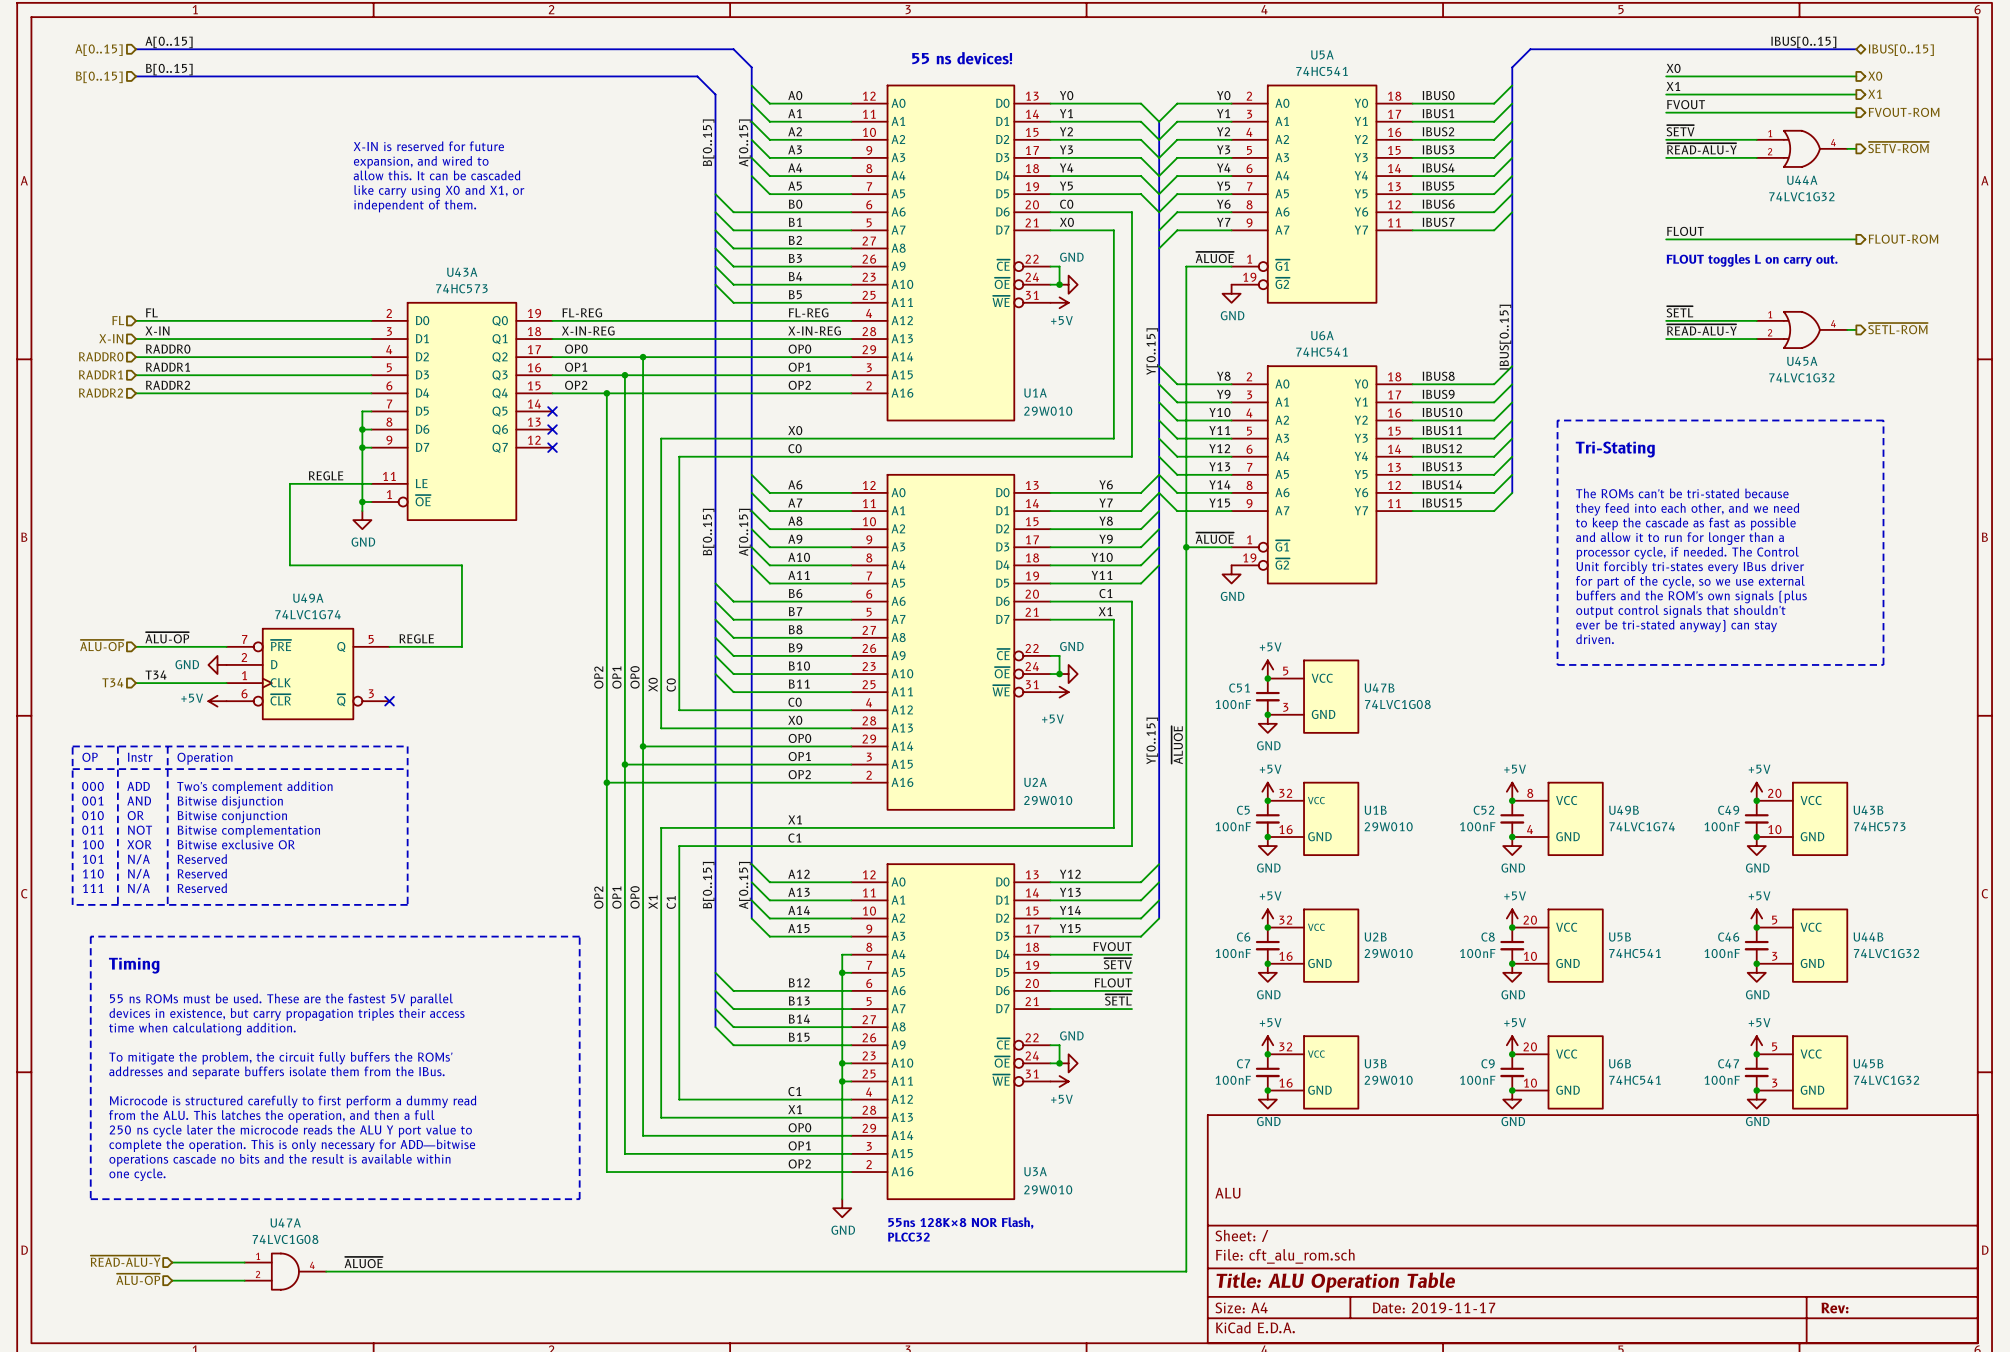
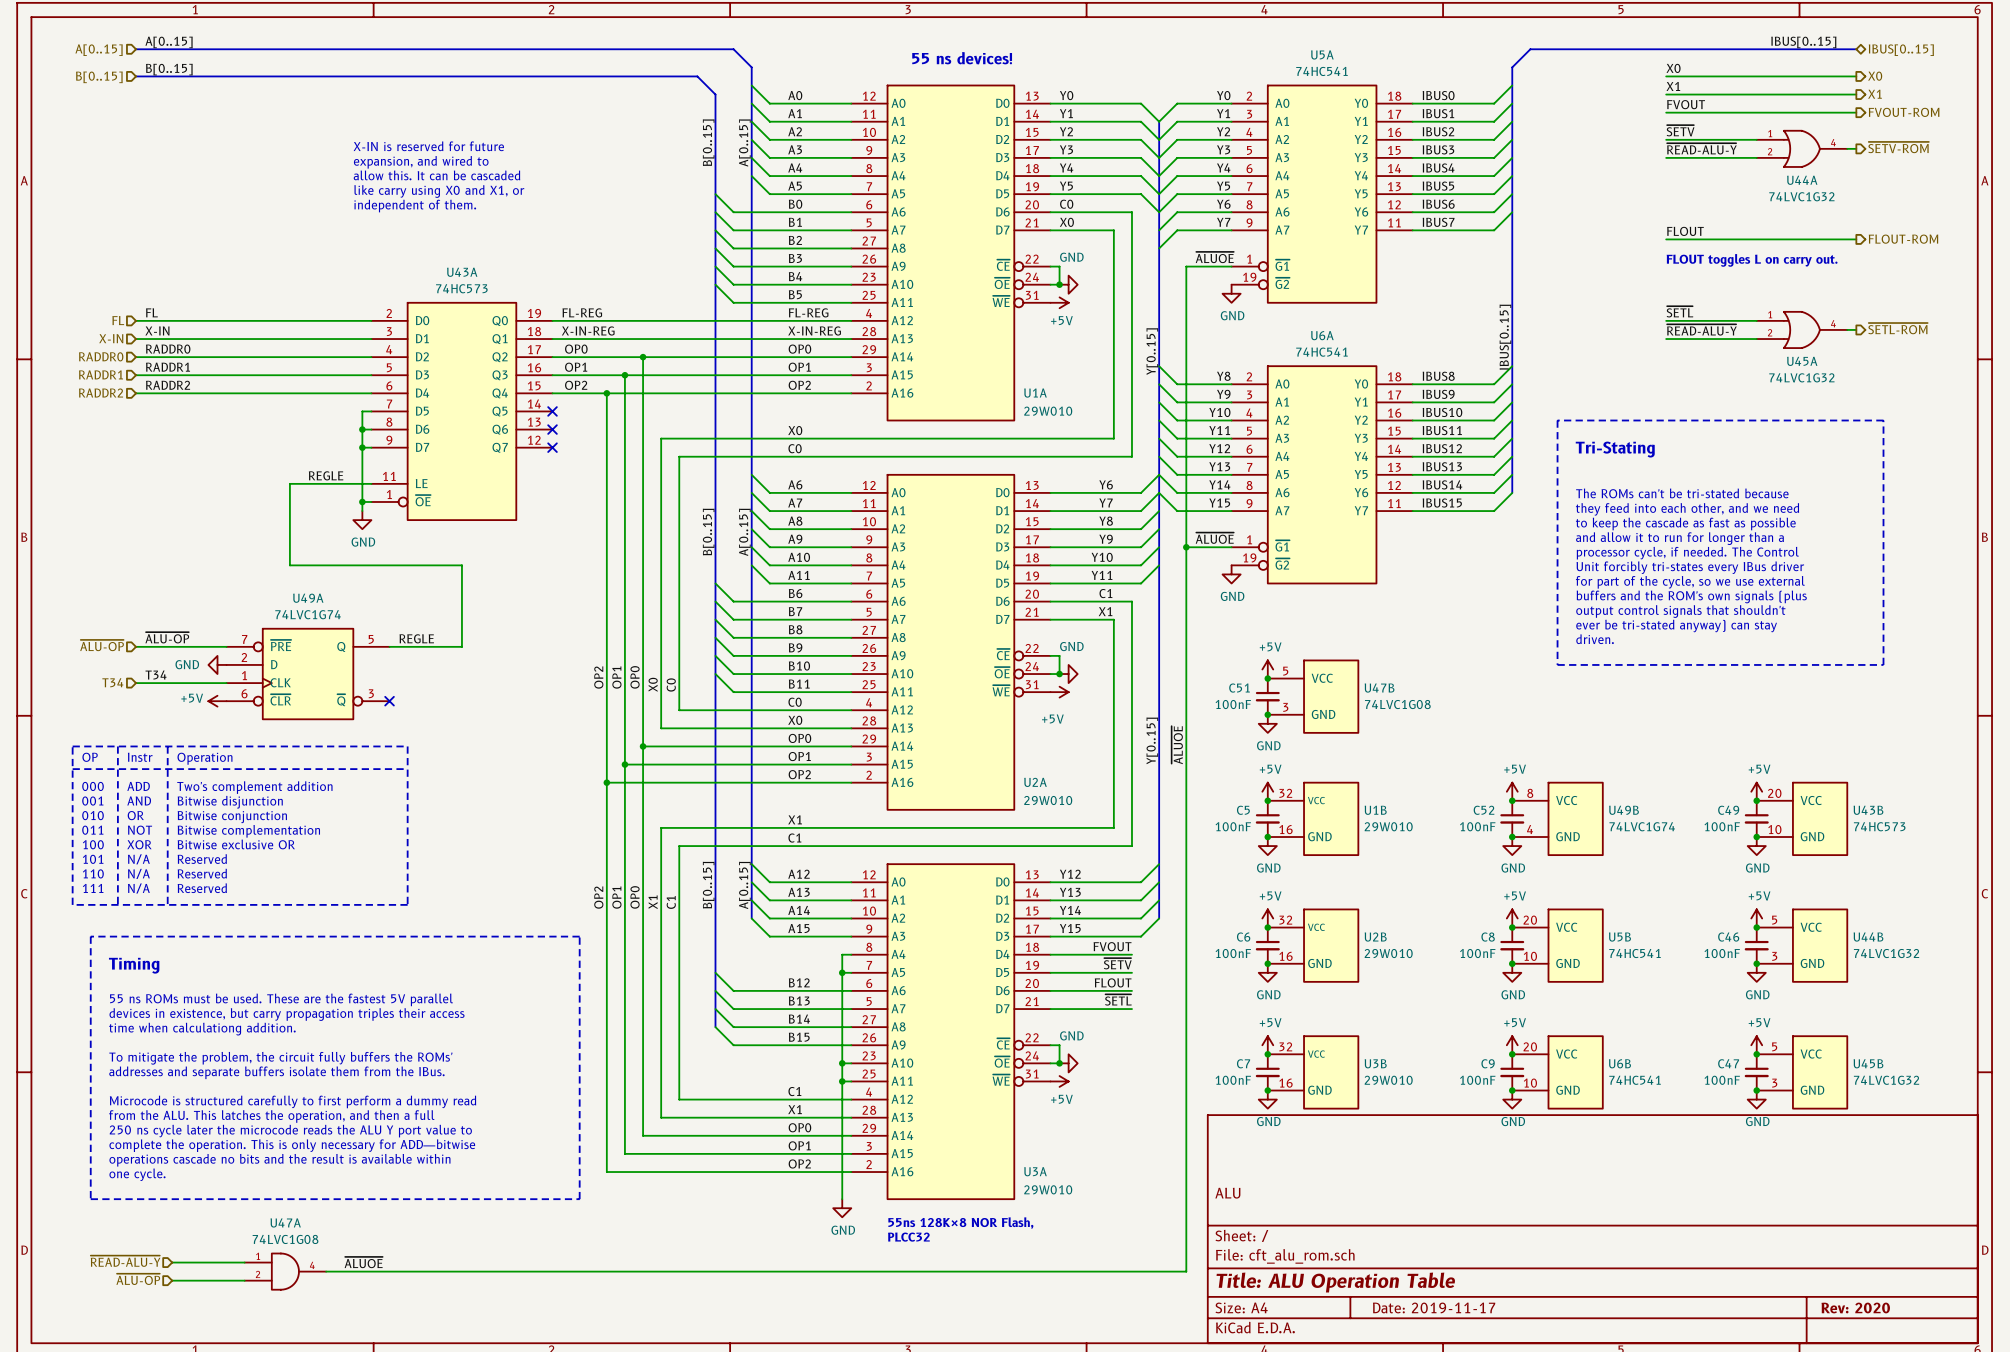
title block: Rev: (1834, 1308) -> Rev: 2020 (1855, 1308)

